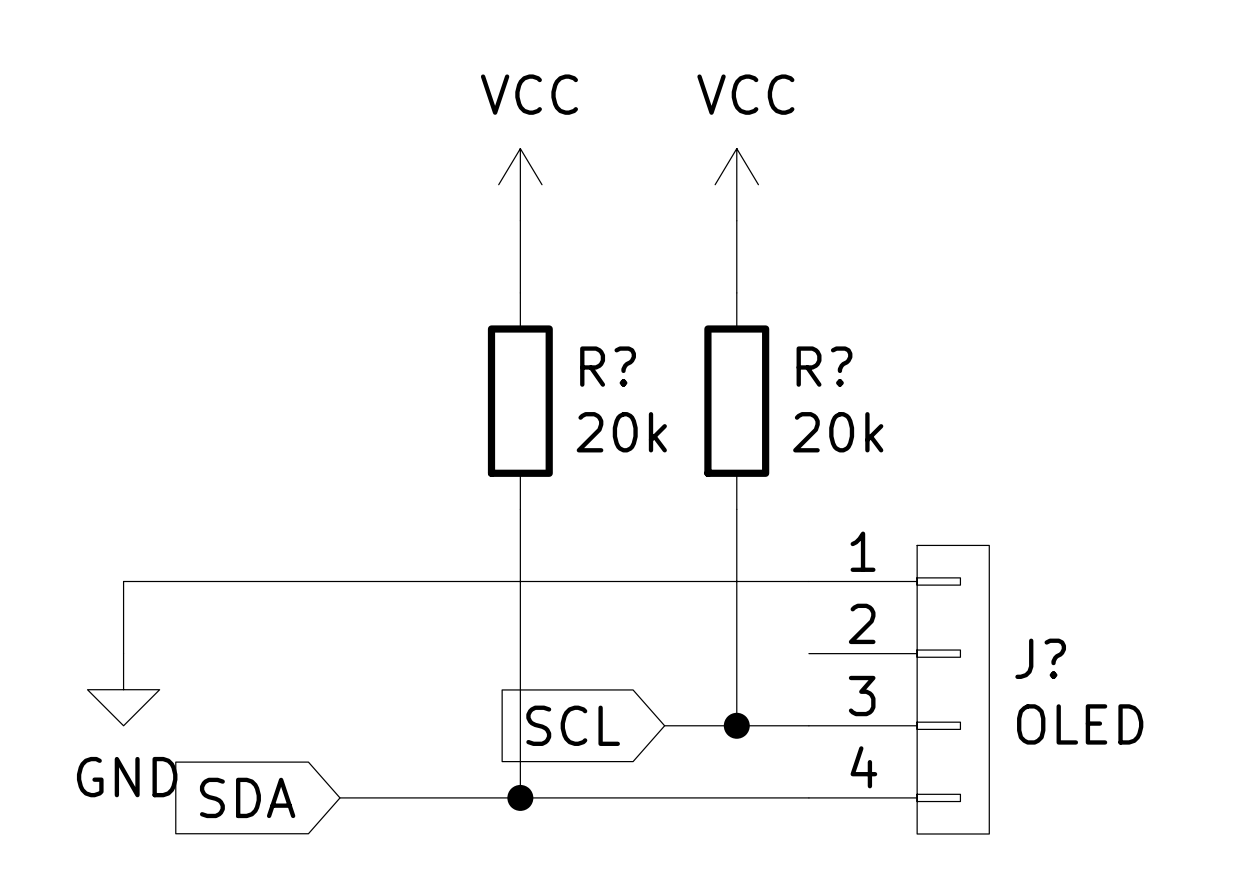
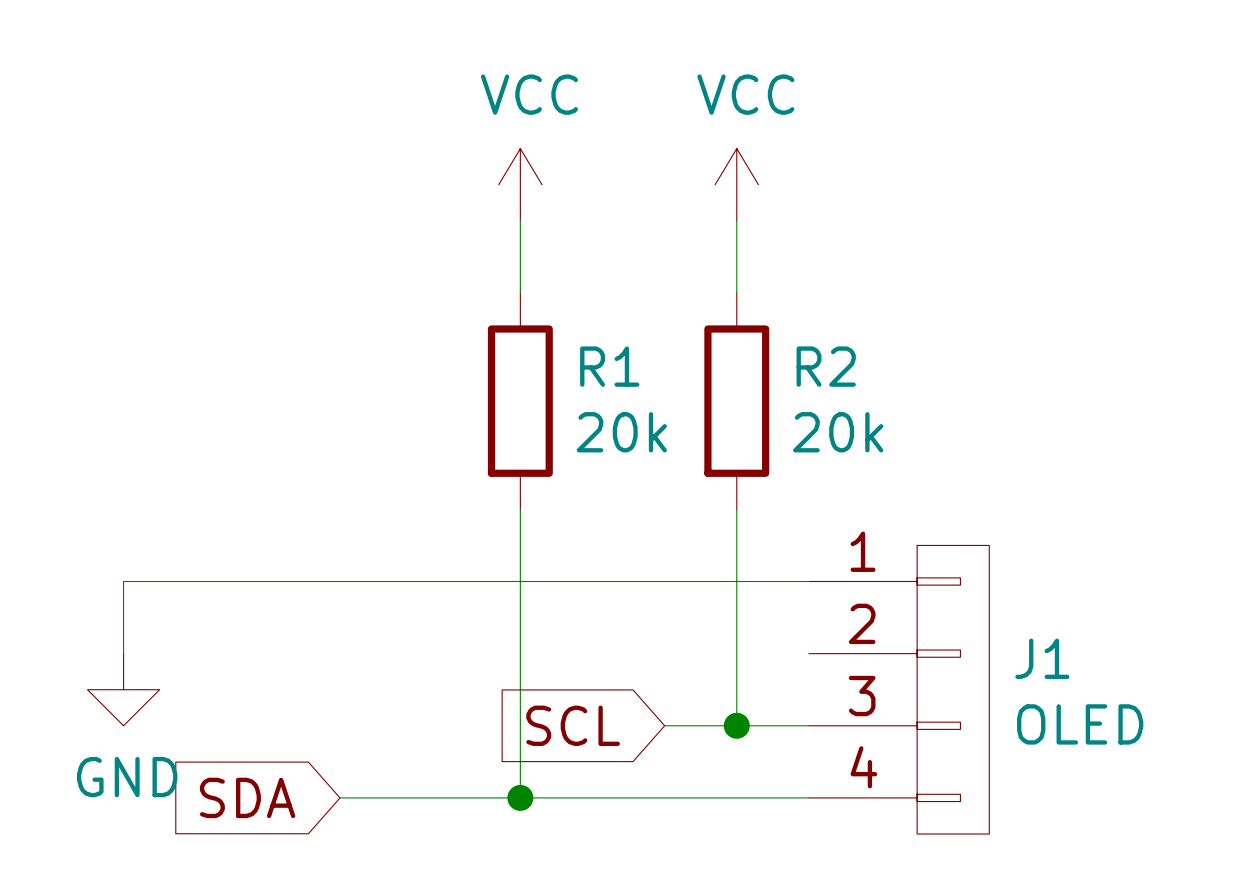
R? name: R? (608, 366) -> R1 (609, 366)
R? name: R? (824, 366) -> R2 (826, 366)
J? name: J? (1040, 658) -> J1 (1042, 658)

